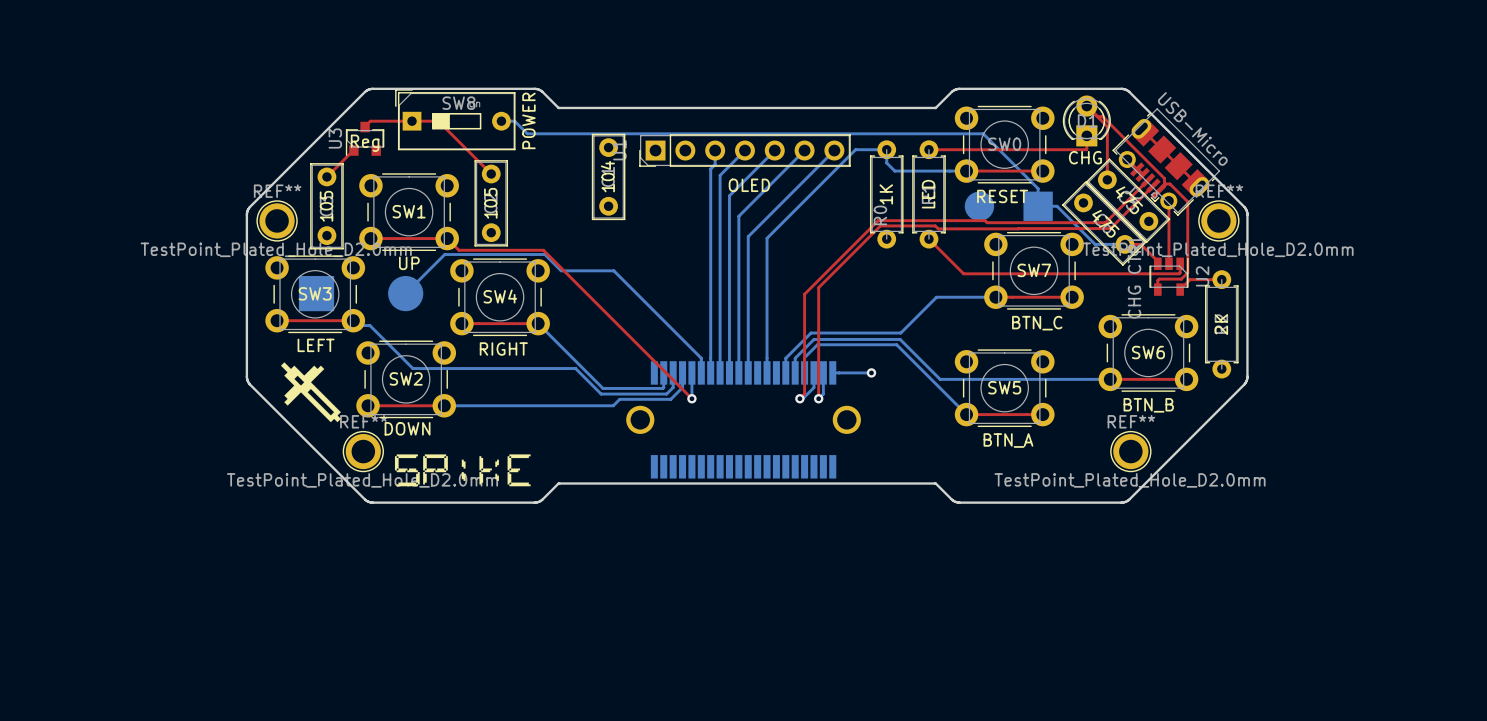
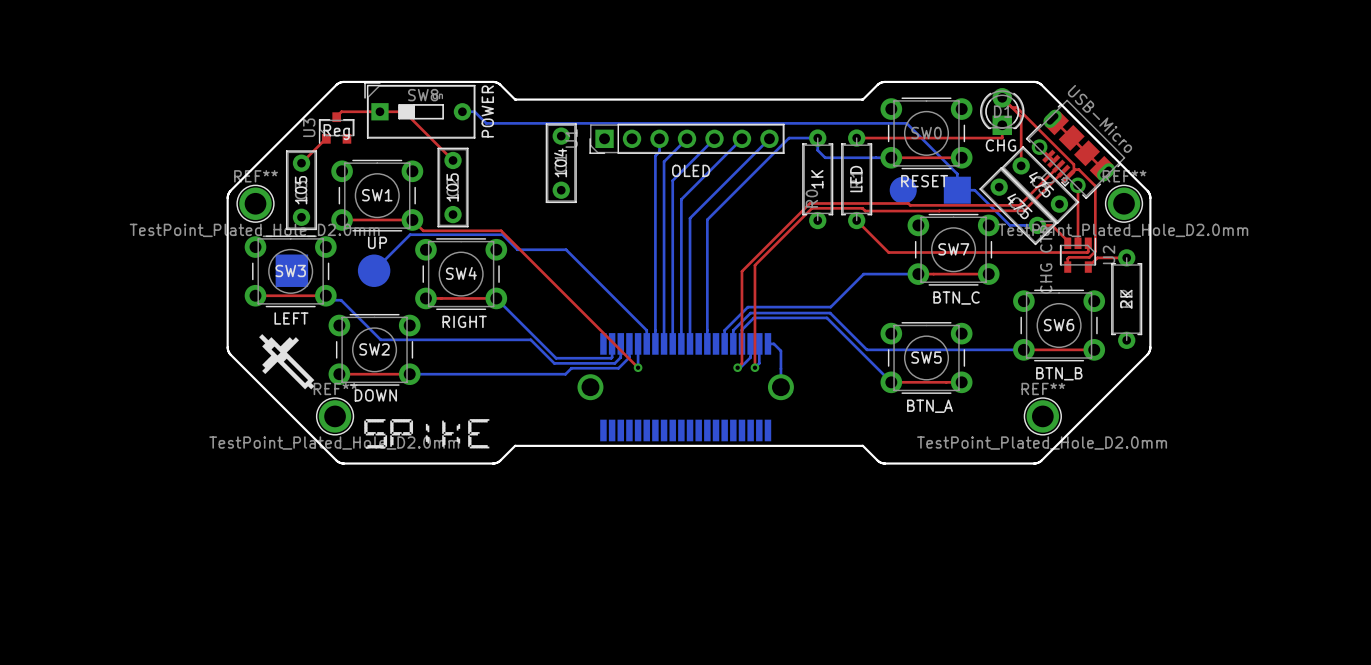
bottom track: (839, 372) (871, 372) -> (773, 343) (780, 350) (780, 387)
via: (871, 372) -> none

